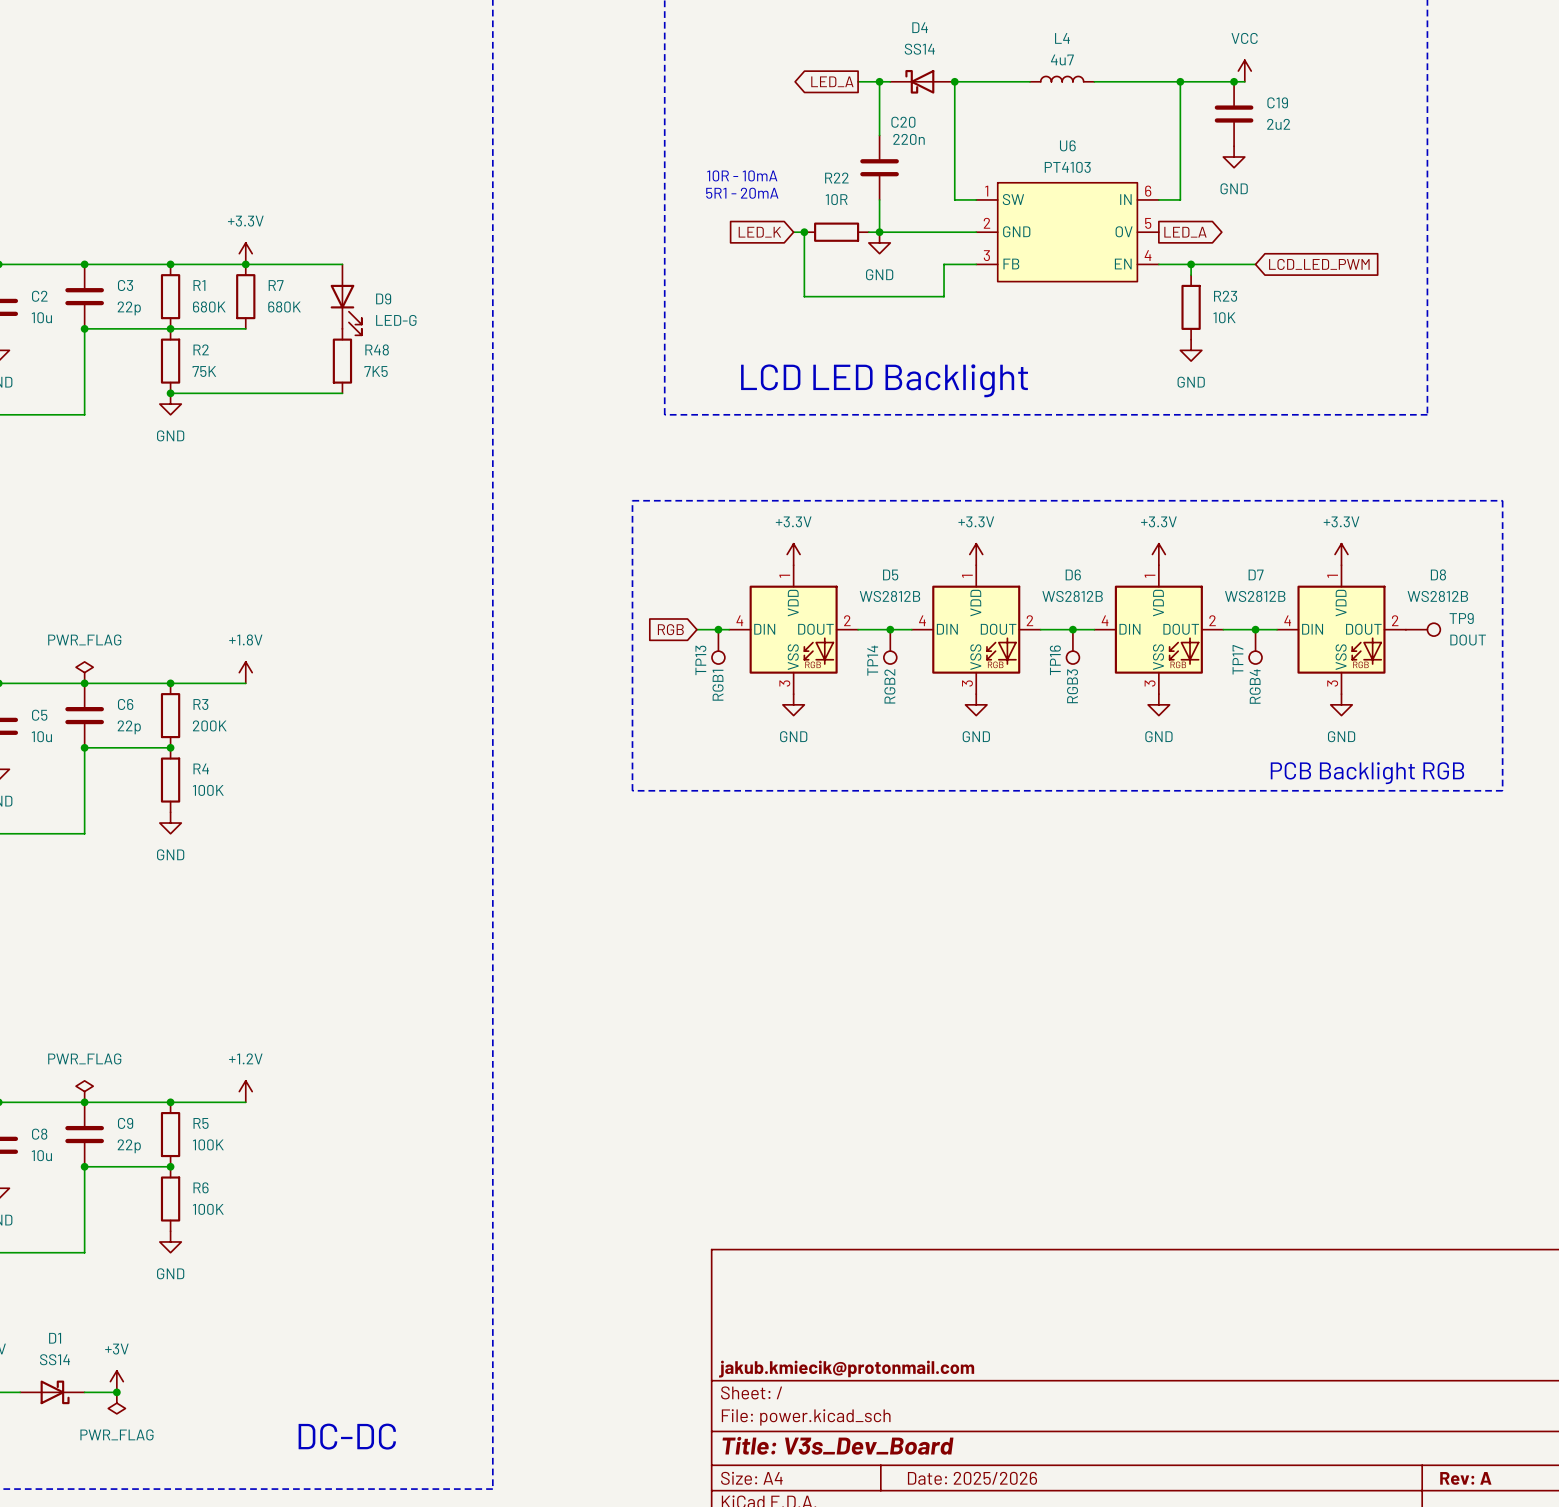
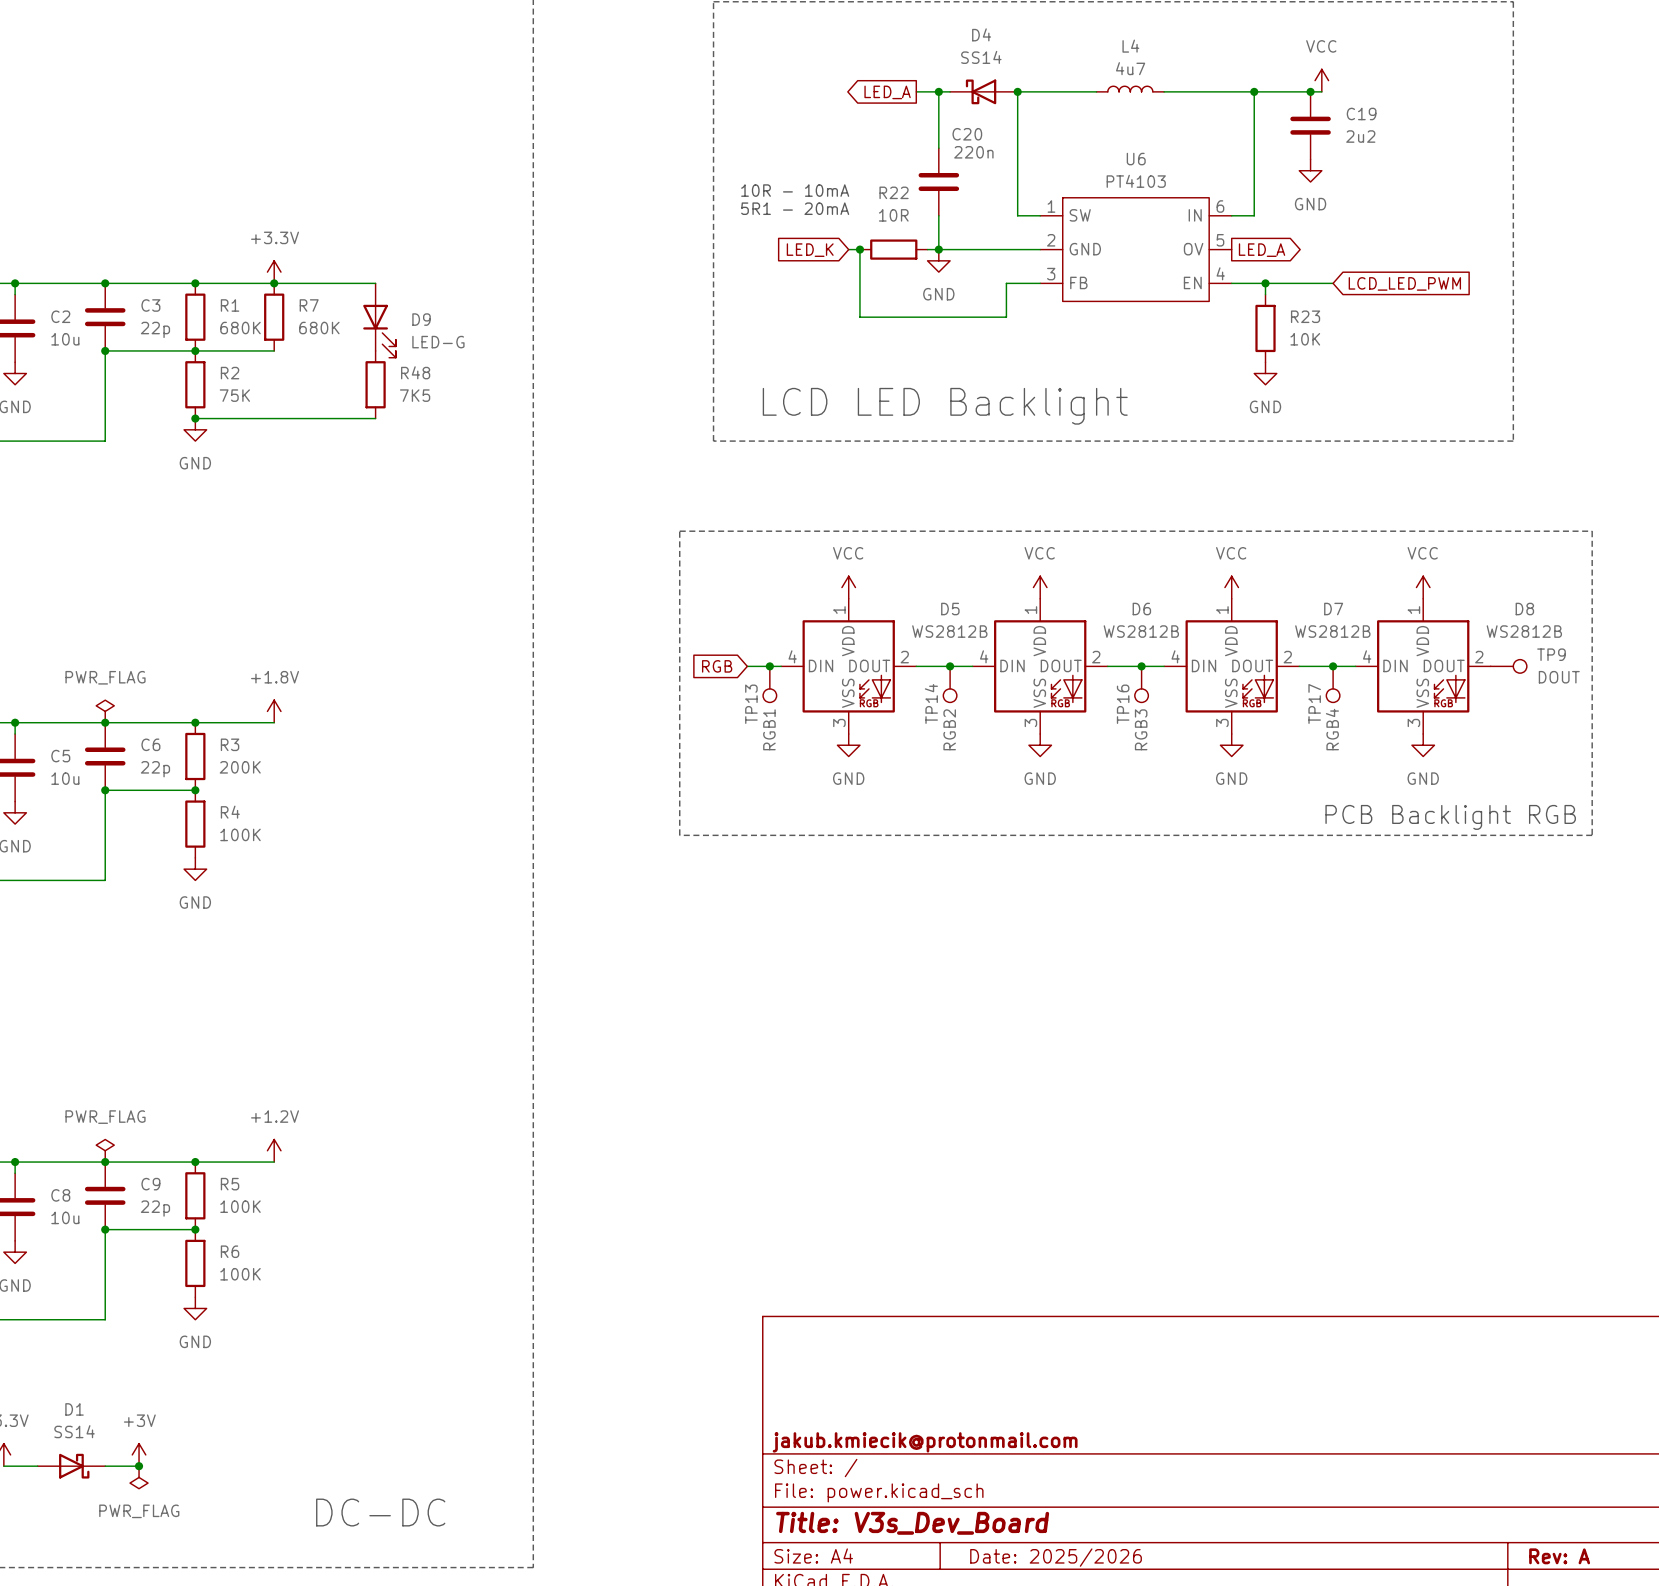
power symbol: +3.3V (793, 554) -> VCC (848, 587)
power symbol: +3.3V (976, 554) -> VCC (1040, 587)
power symbol: +3.3V (1158, 554) -> VCC (1231, 587)
power symbol: +3.3V (1341, 554) -> VCC (1423, 587)

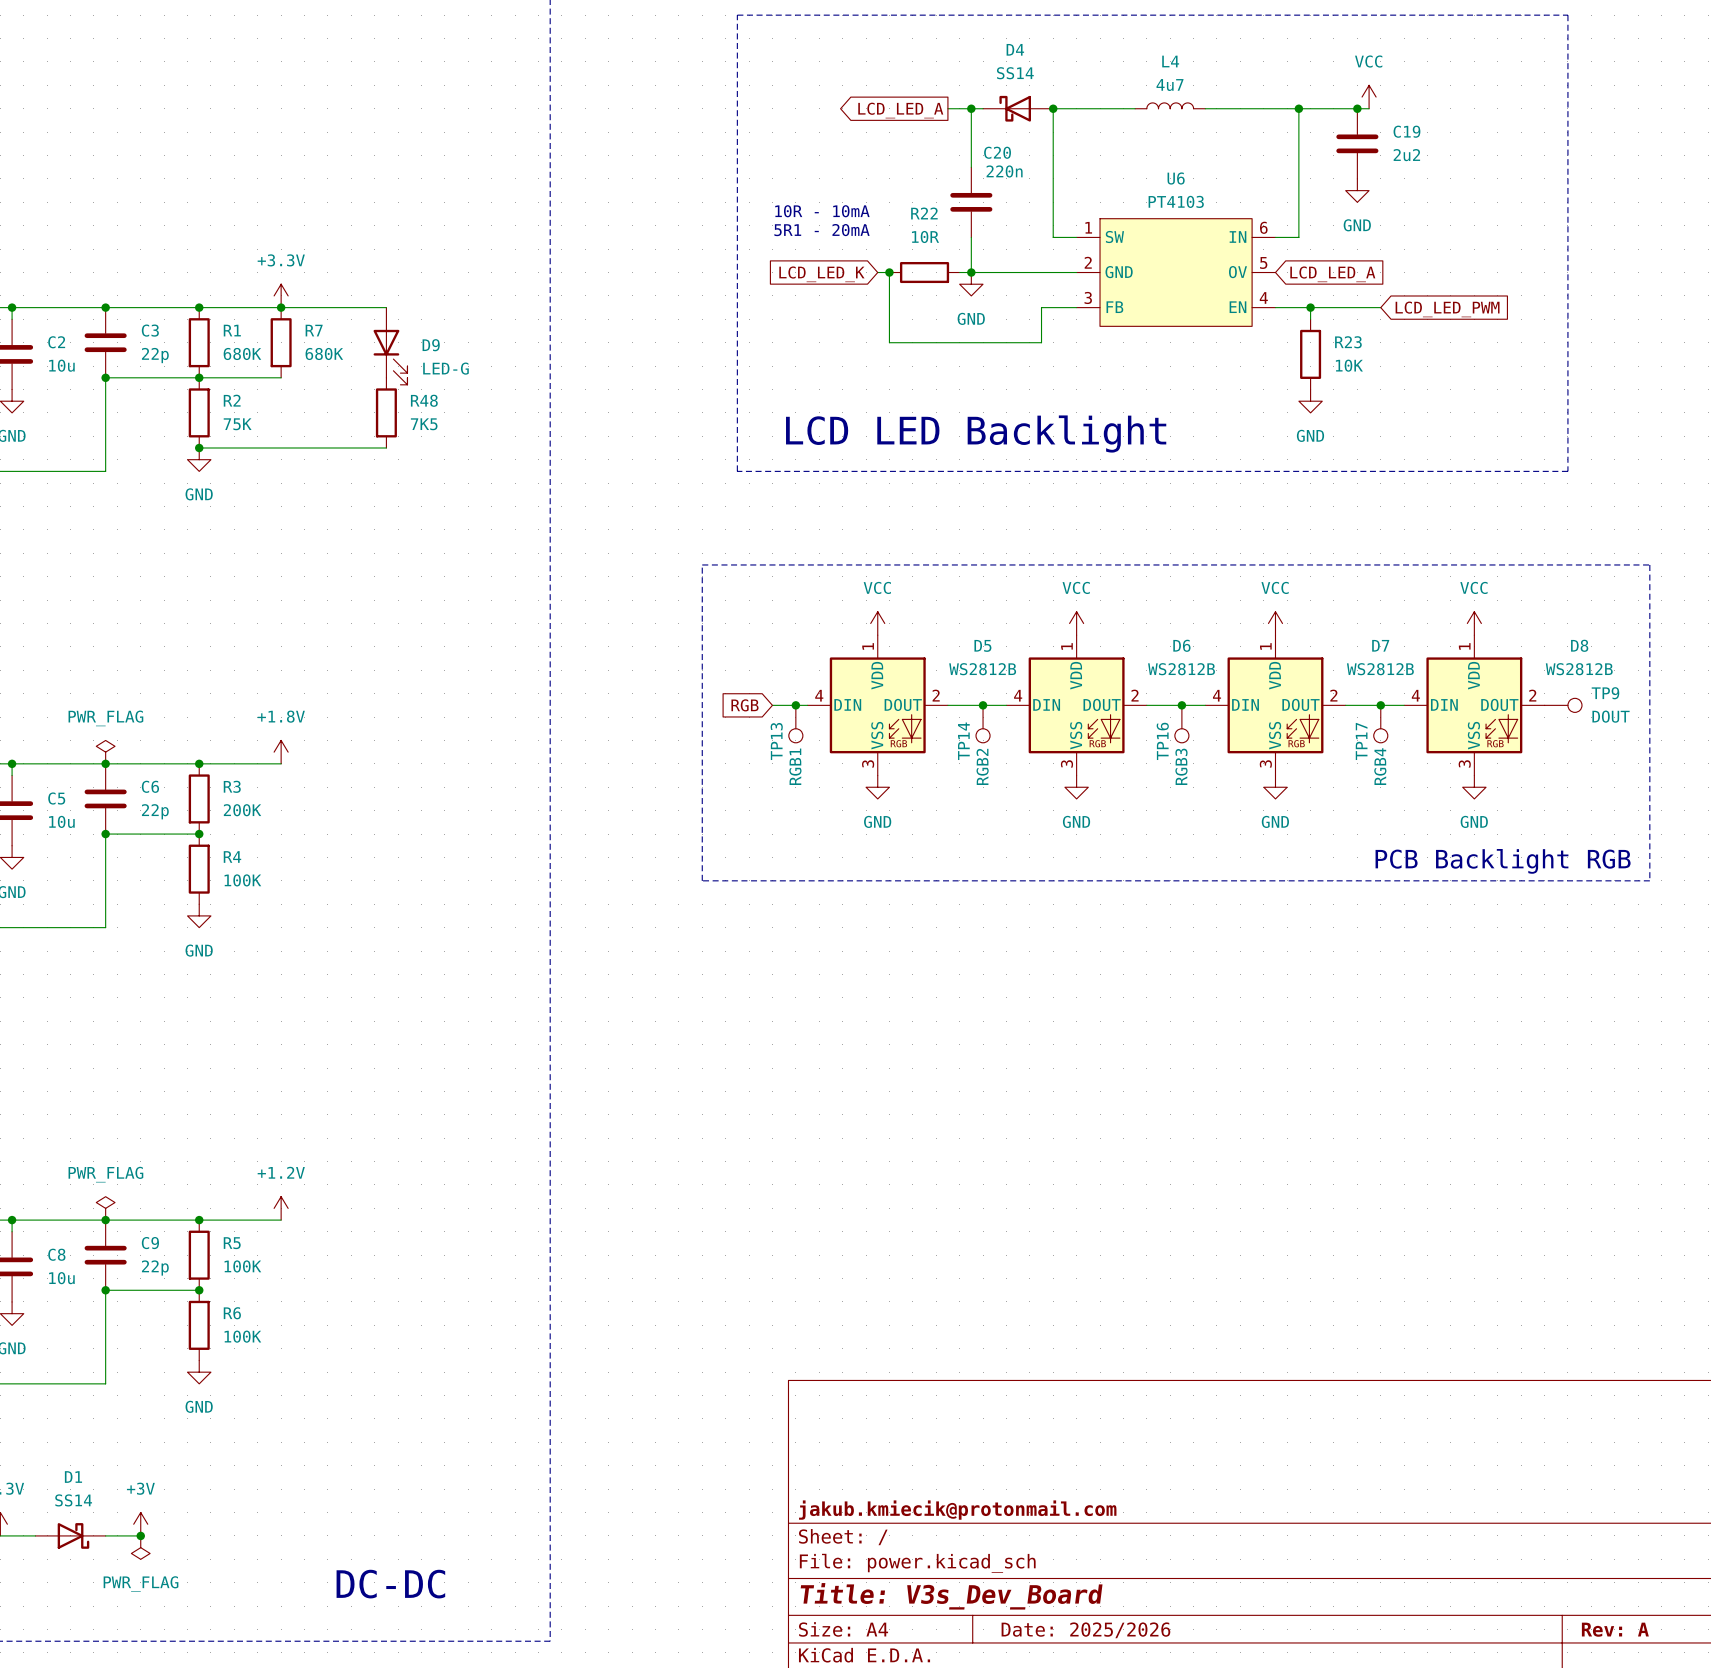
global label: LED_A (887, 92) -> LCD_LED_A (900, 110)
global label: LED_K (810, 250) -> LCD_LED_K (821, 274)
global label shape: output (1262, 250) -> input (1332, 274)
global label: LED_A (1262, 250) -> LCD_LED_A (1332, 274)

